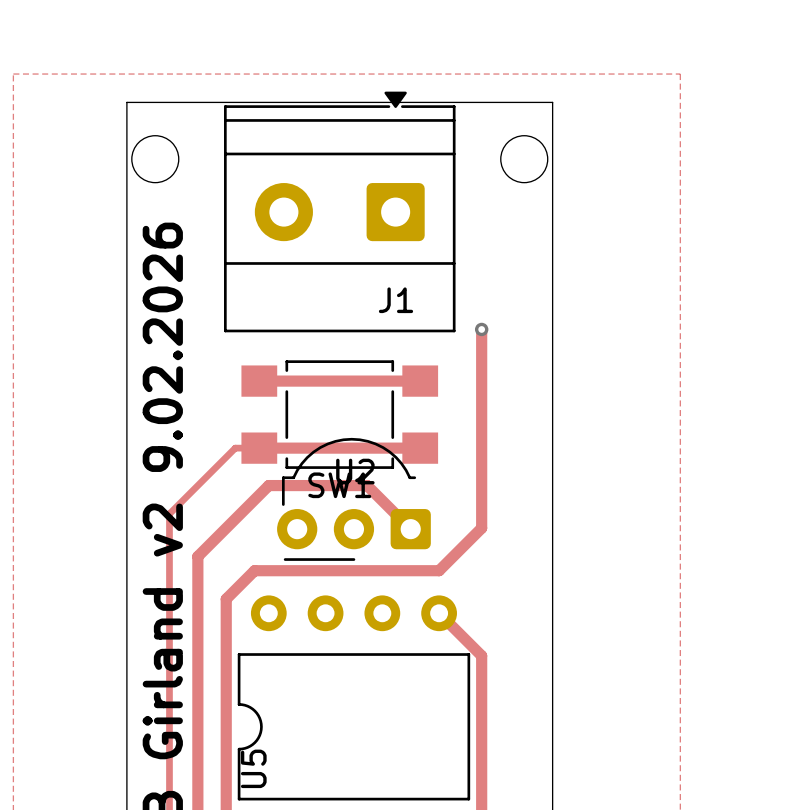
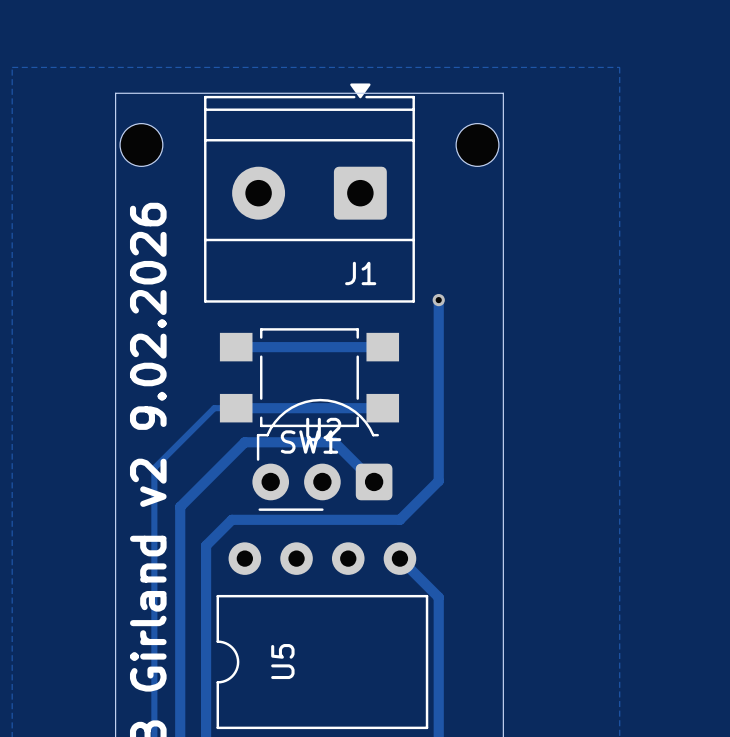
U5 name position: U5 (253, 768) -> U5 (282, 661)

